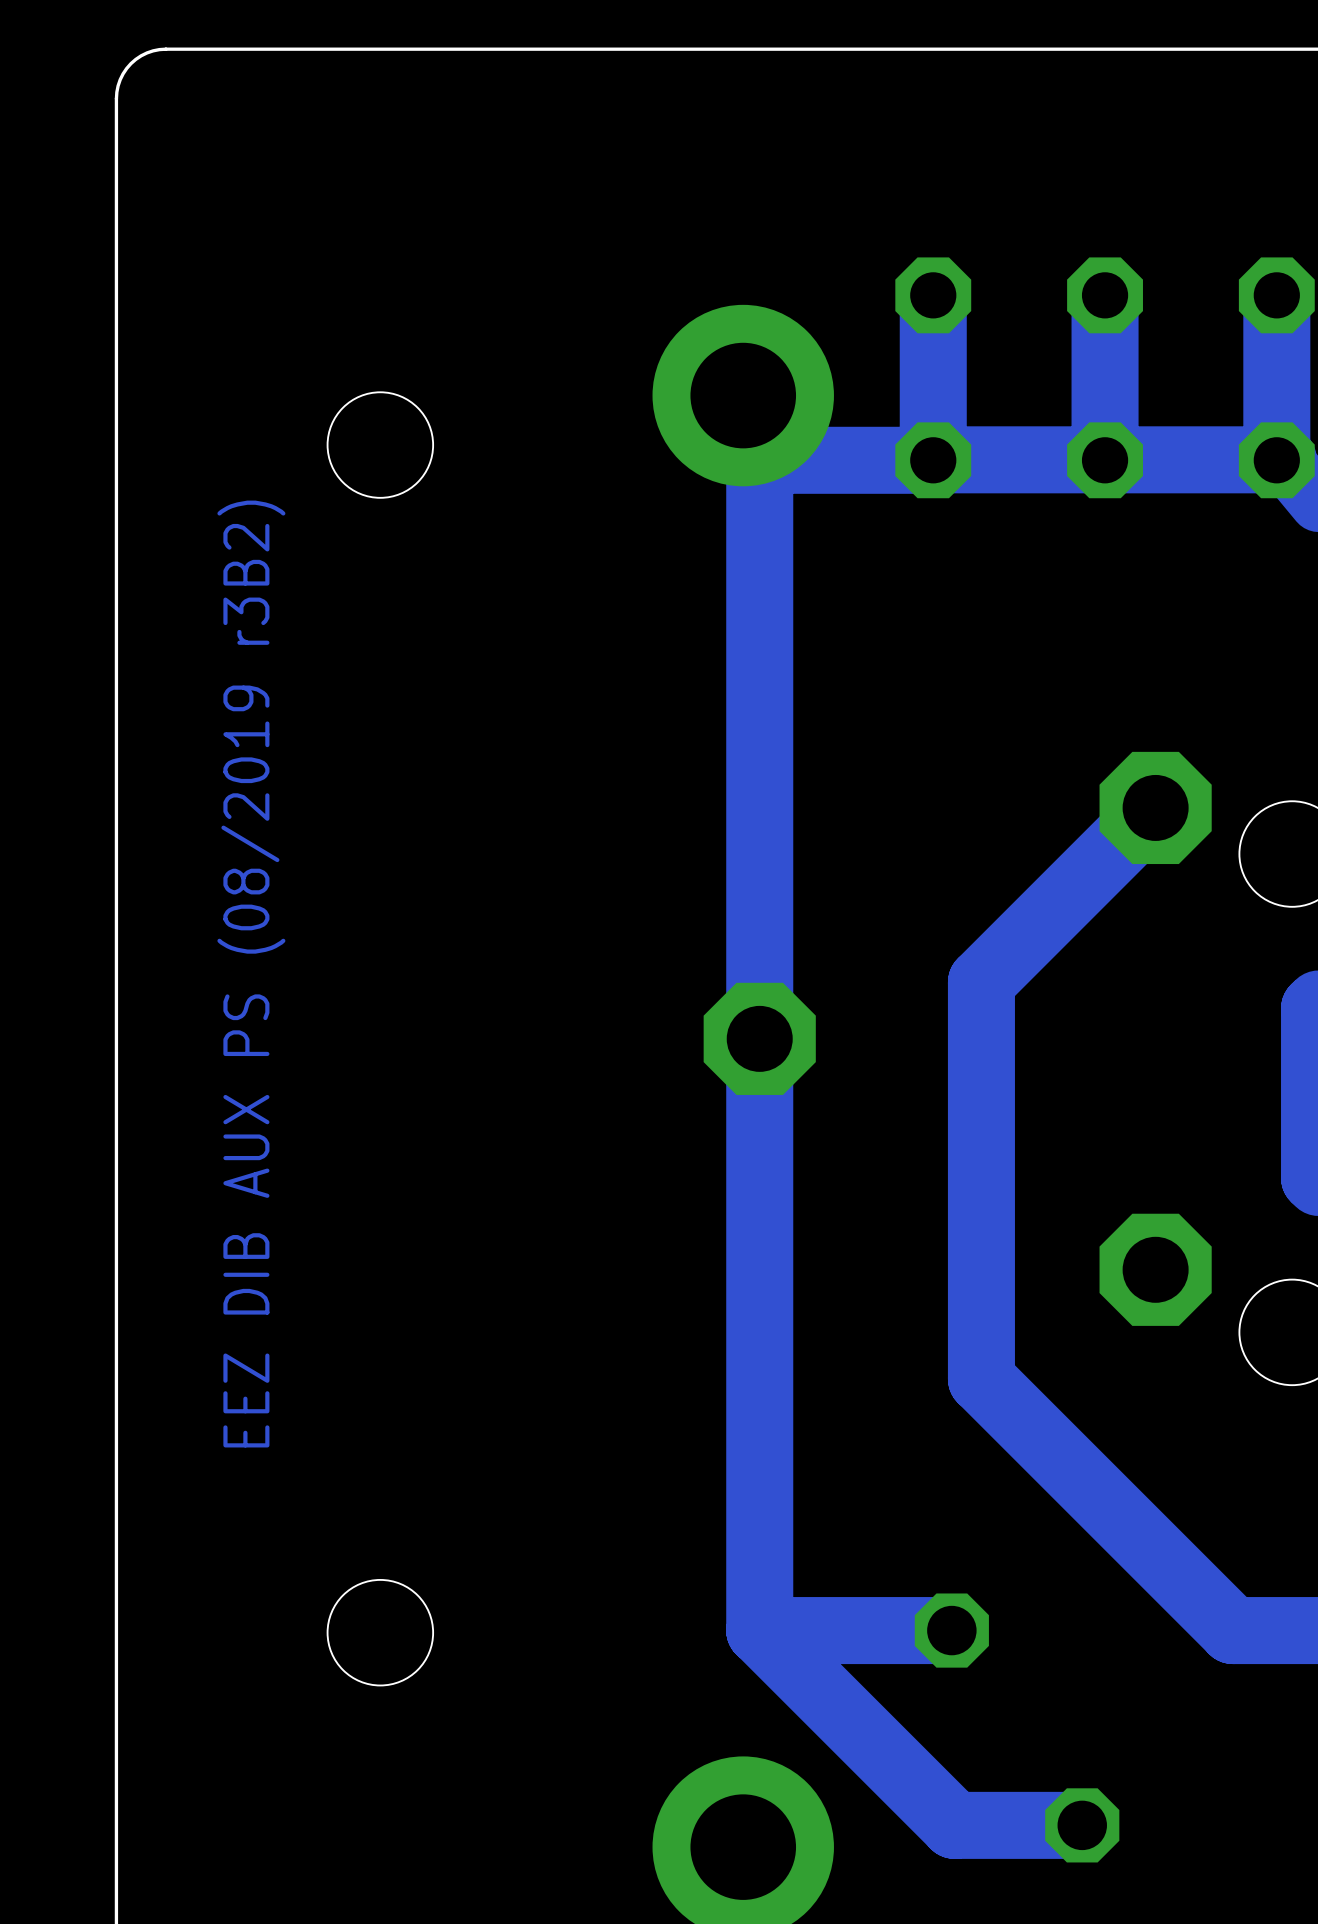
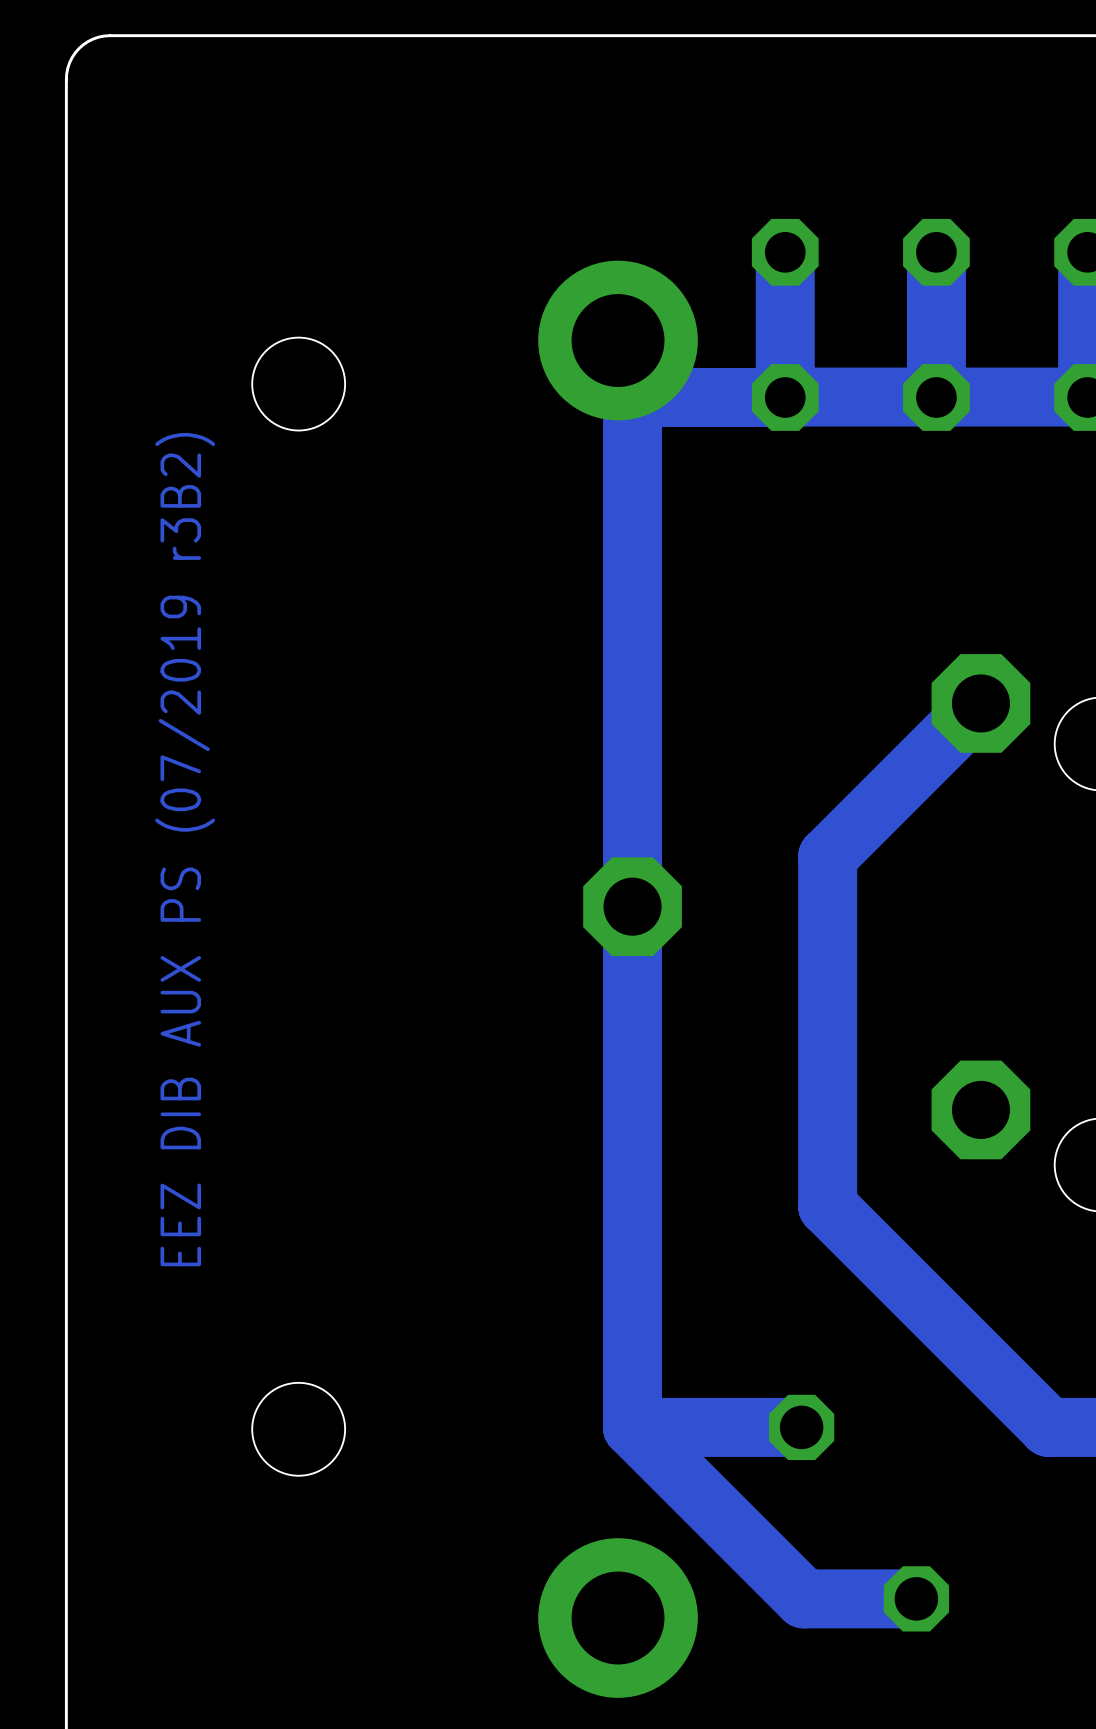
text: EEZ DIB AUX PS (08/2019 r3B2) (251, 974) -> EEZ DIB AUX PS (07/2019 r3B2) (185, 849)

